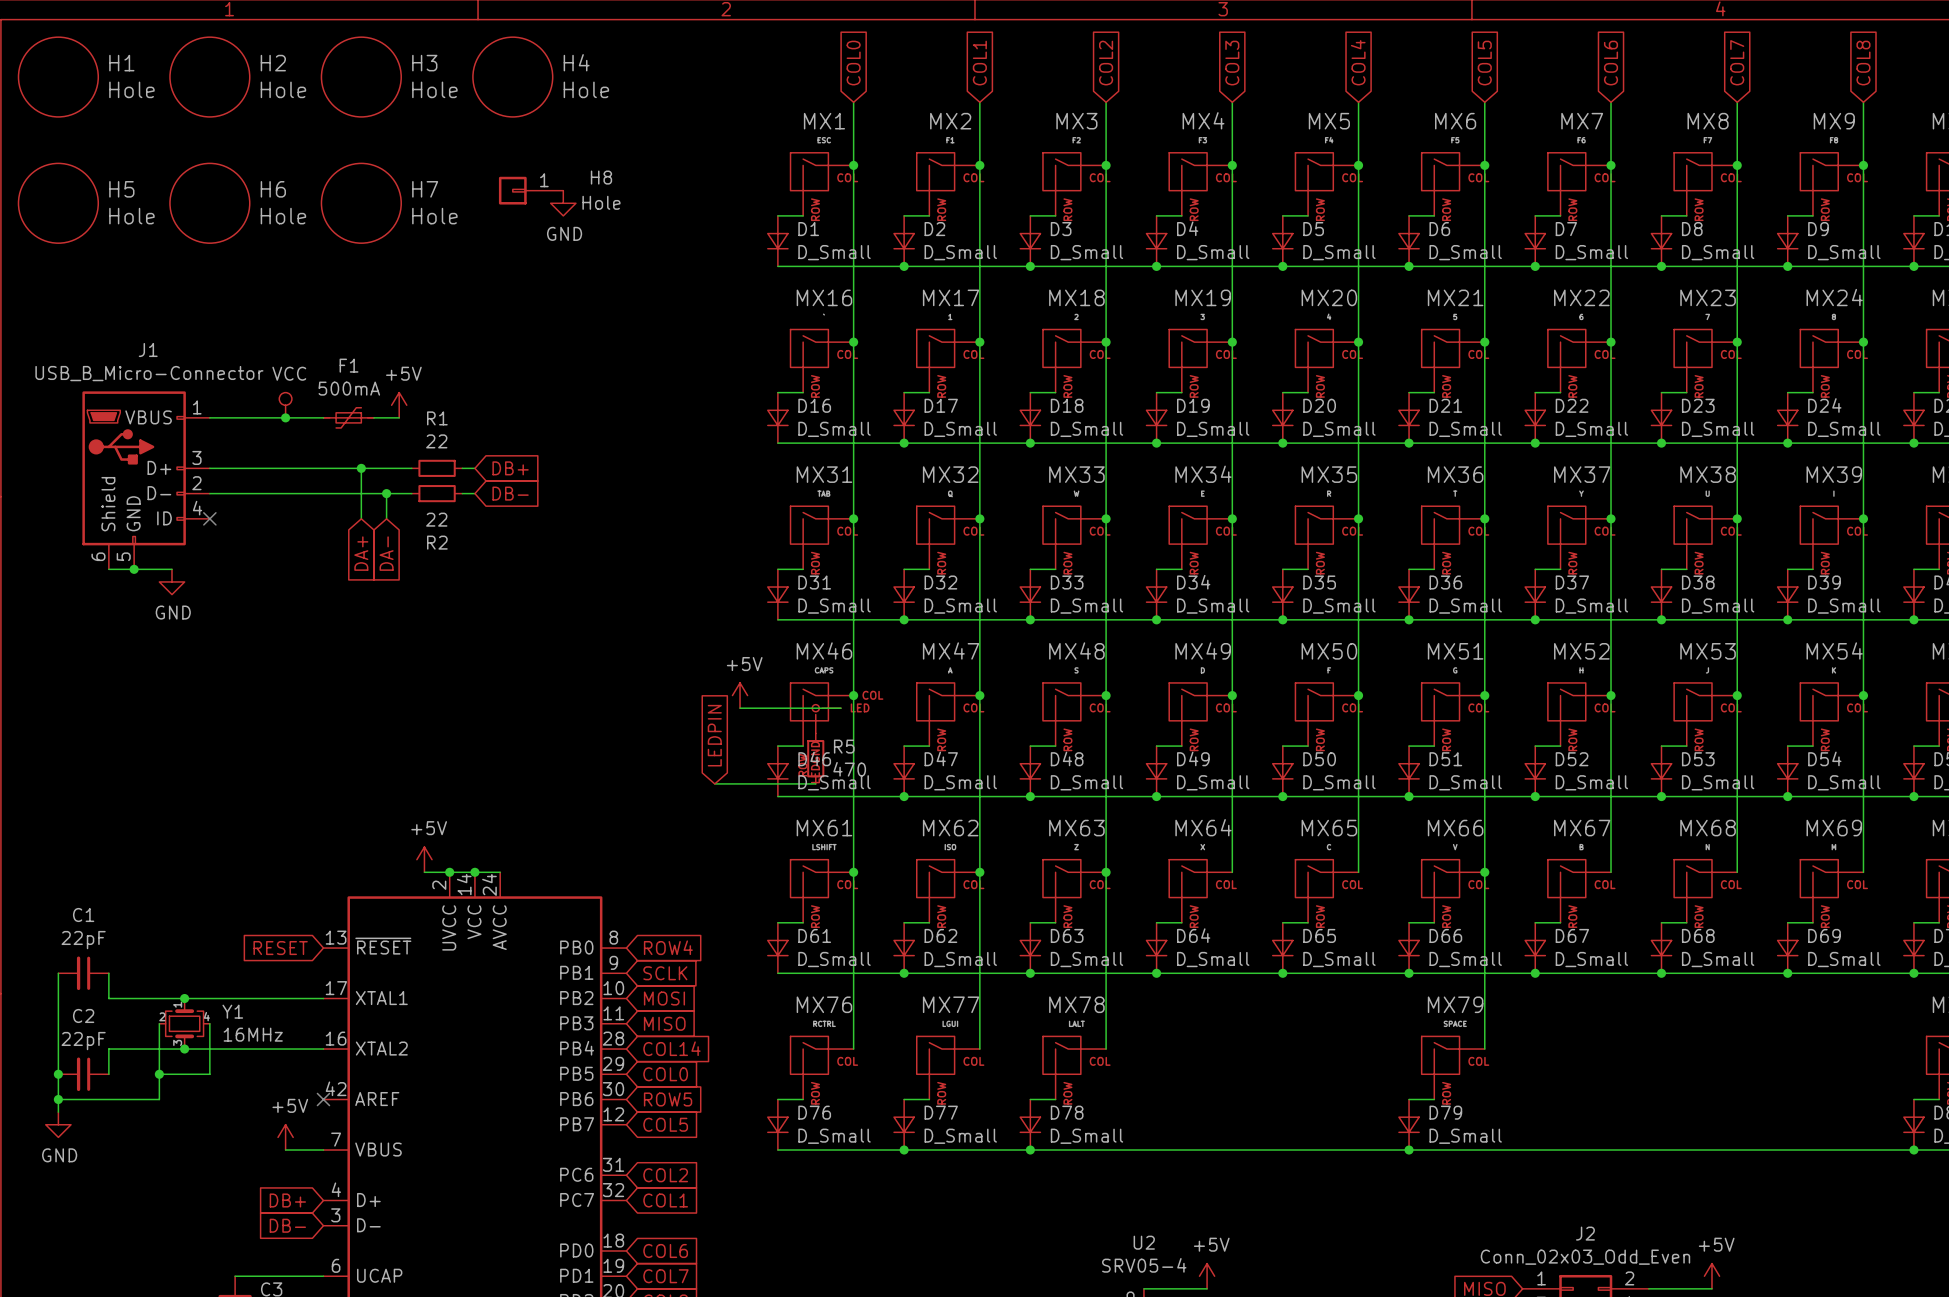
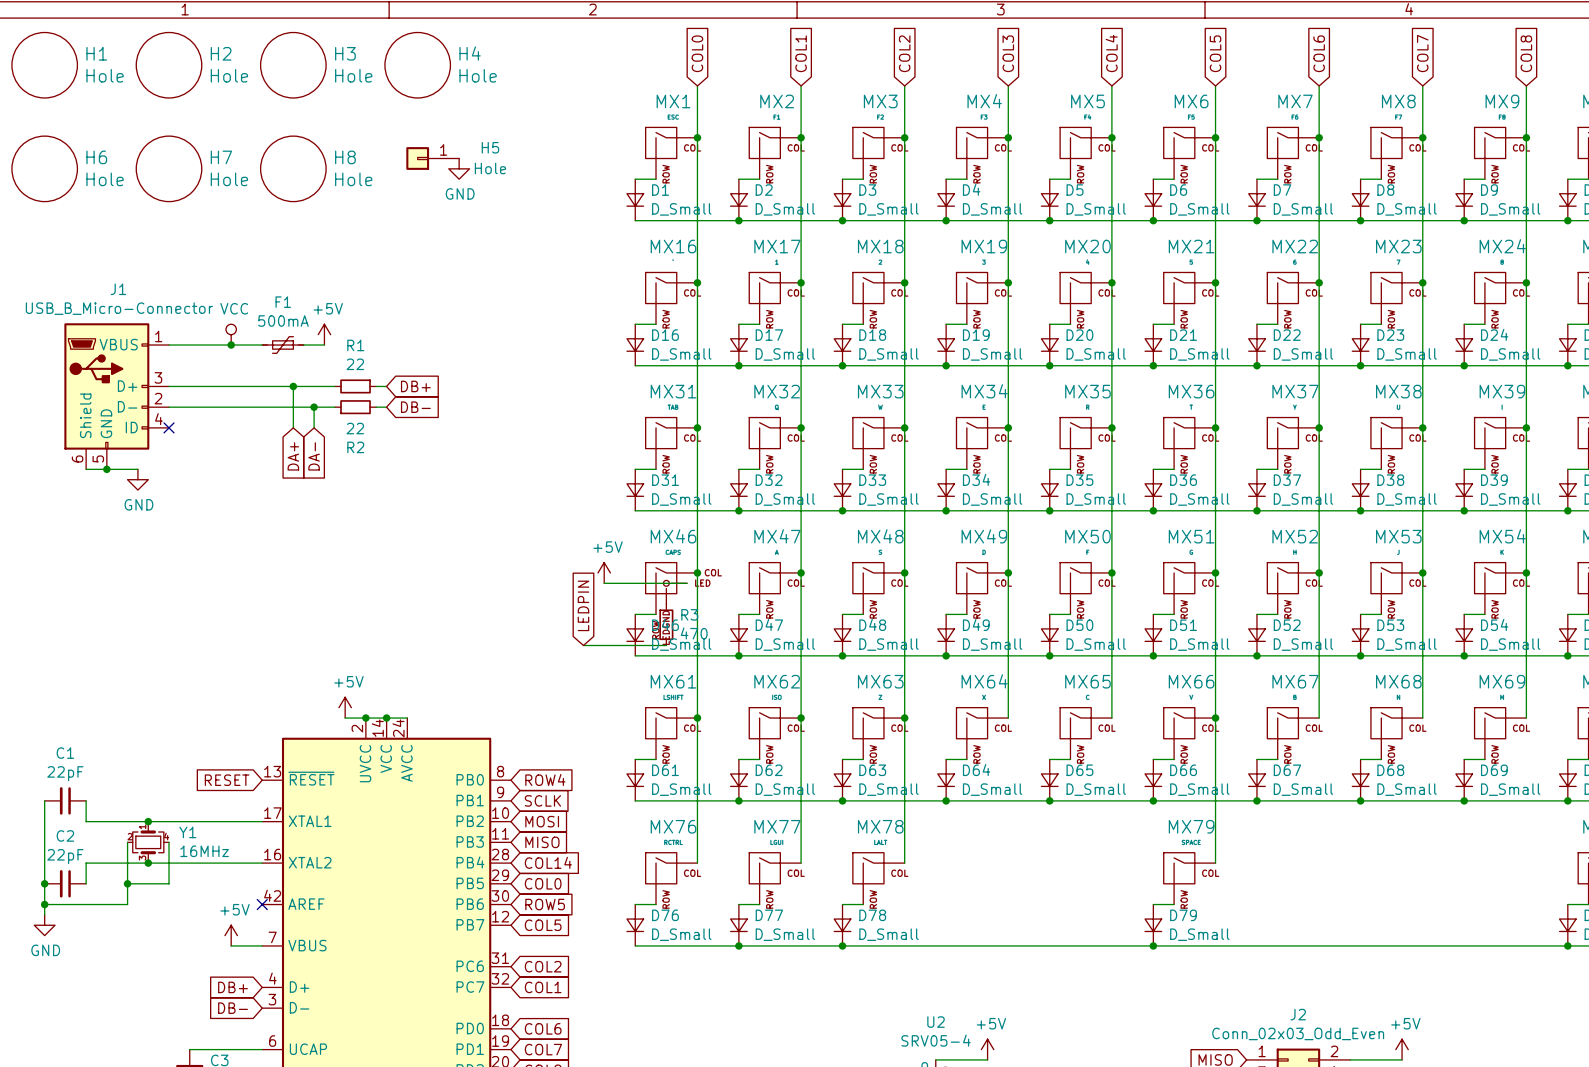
H8 name: H8 (601, 177) -> H5 (490, 147)
H5 name: H5 (121, 189) -> H6 (96, 157)
H6 name: H6 (273, 189) -> H7 (221, 157)
H7 name: H7 (425, 189) -> H8 (345, 157)
R5 name: R5 (844, 746) -> R3 (689, 614)

